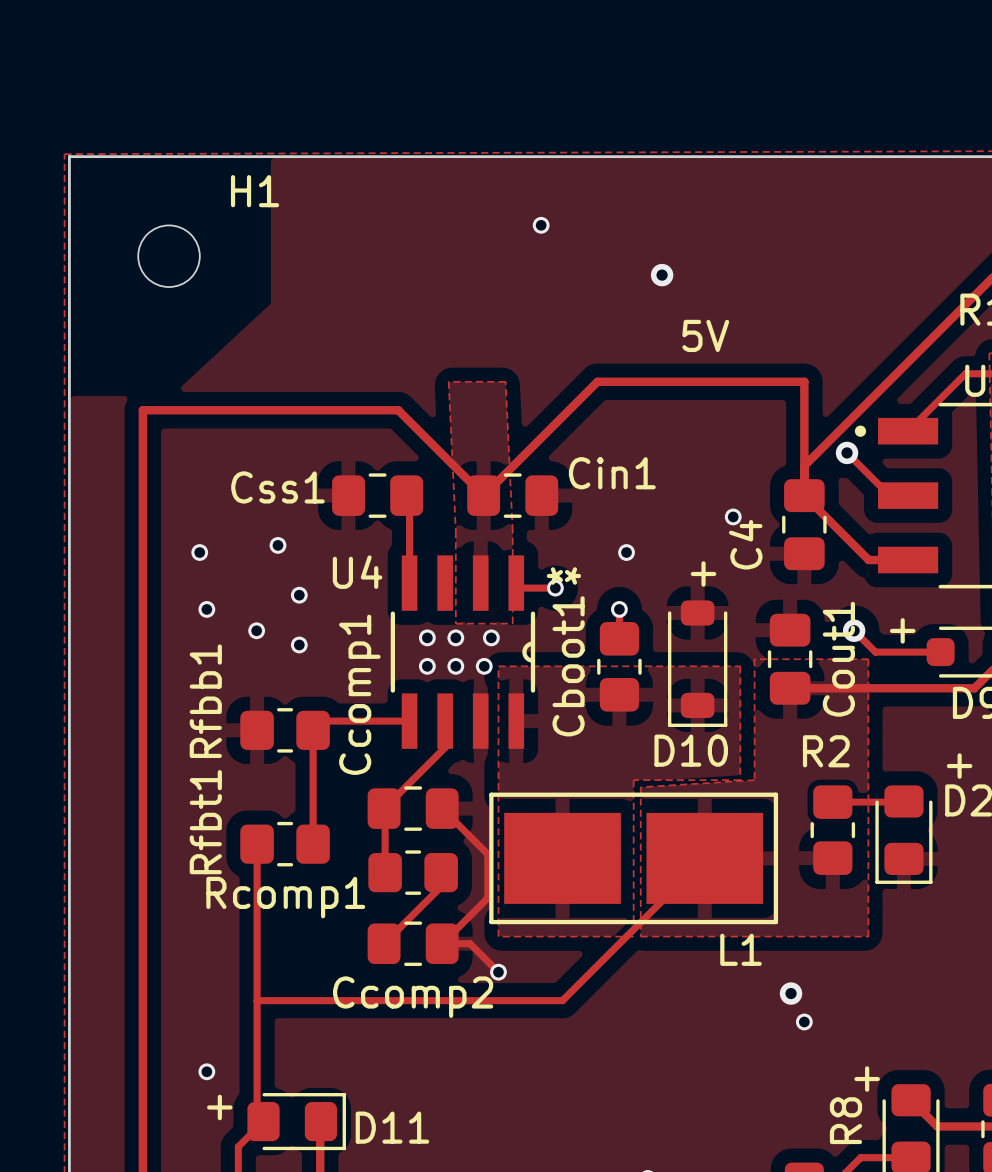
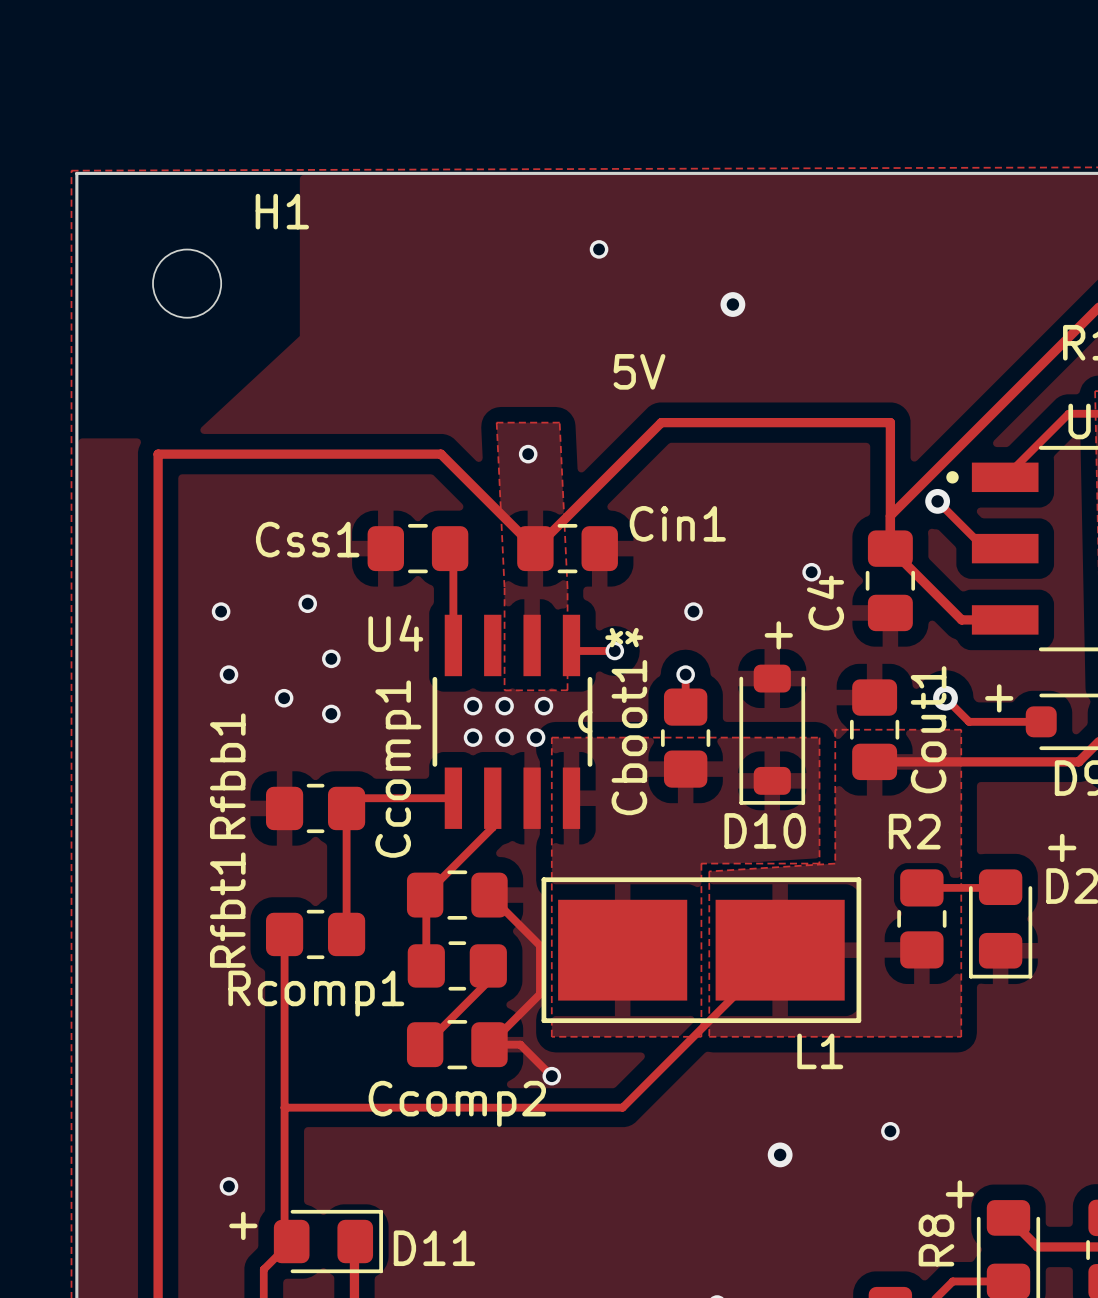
text position: 5V (705, 335) -> 5V (639, 371)
via: none -> (528, 454)
via position: (791, 993) -> (780, 1154)

